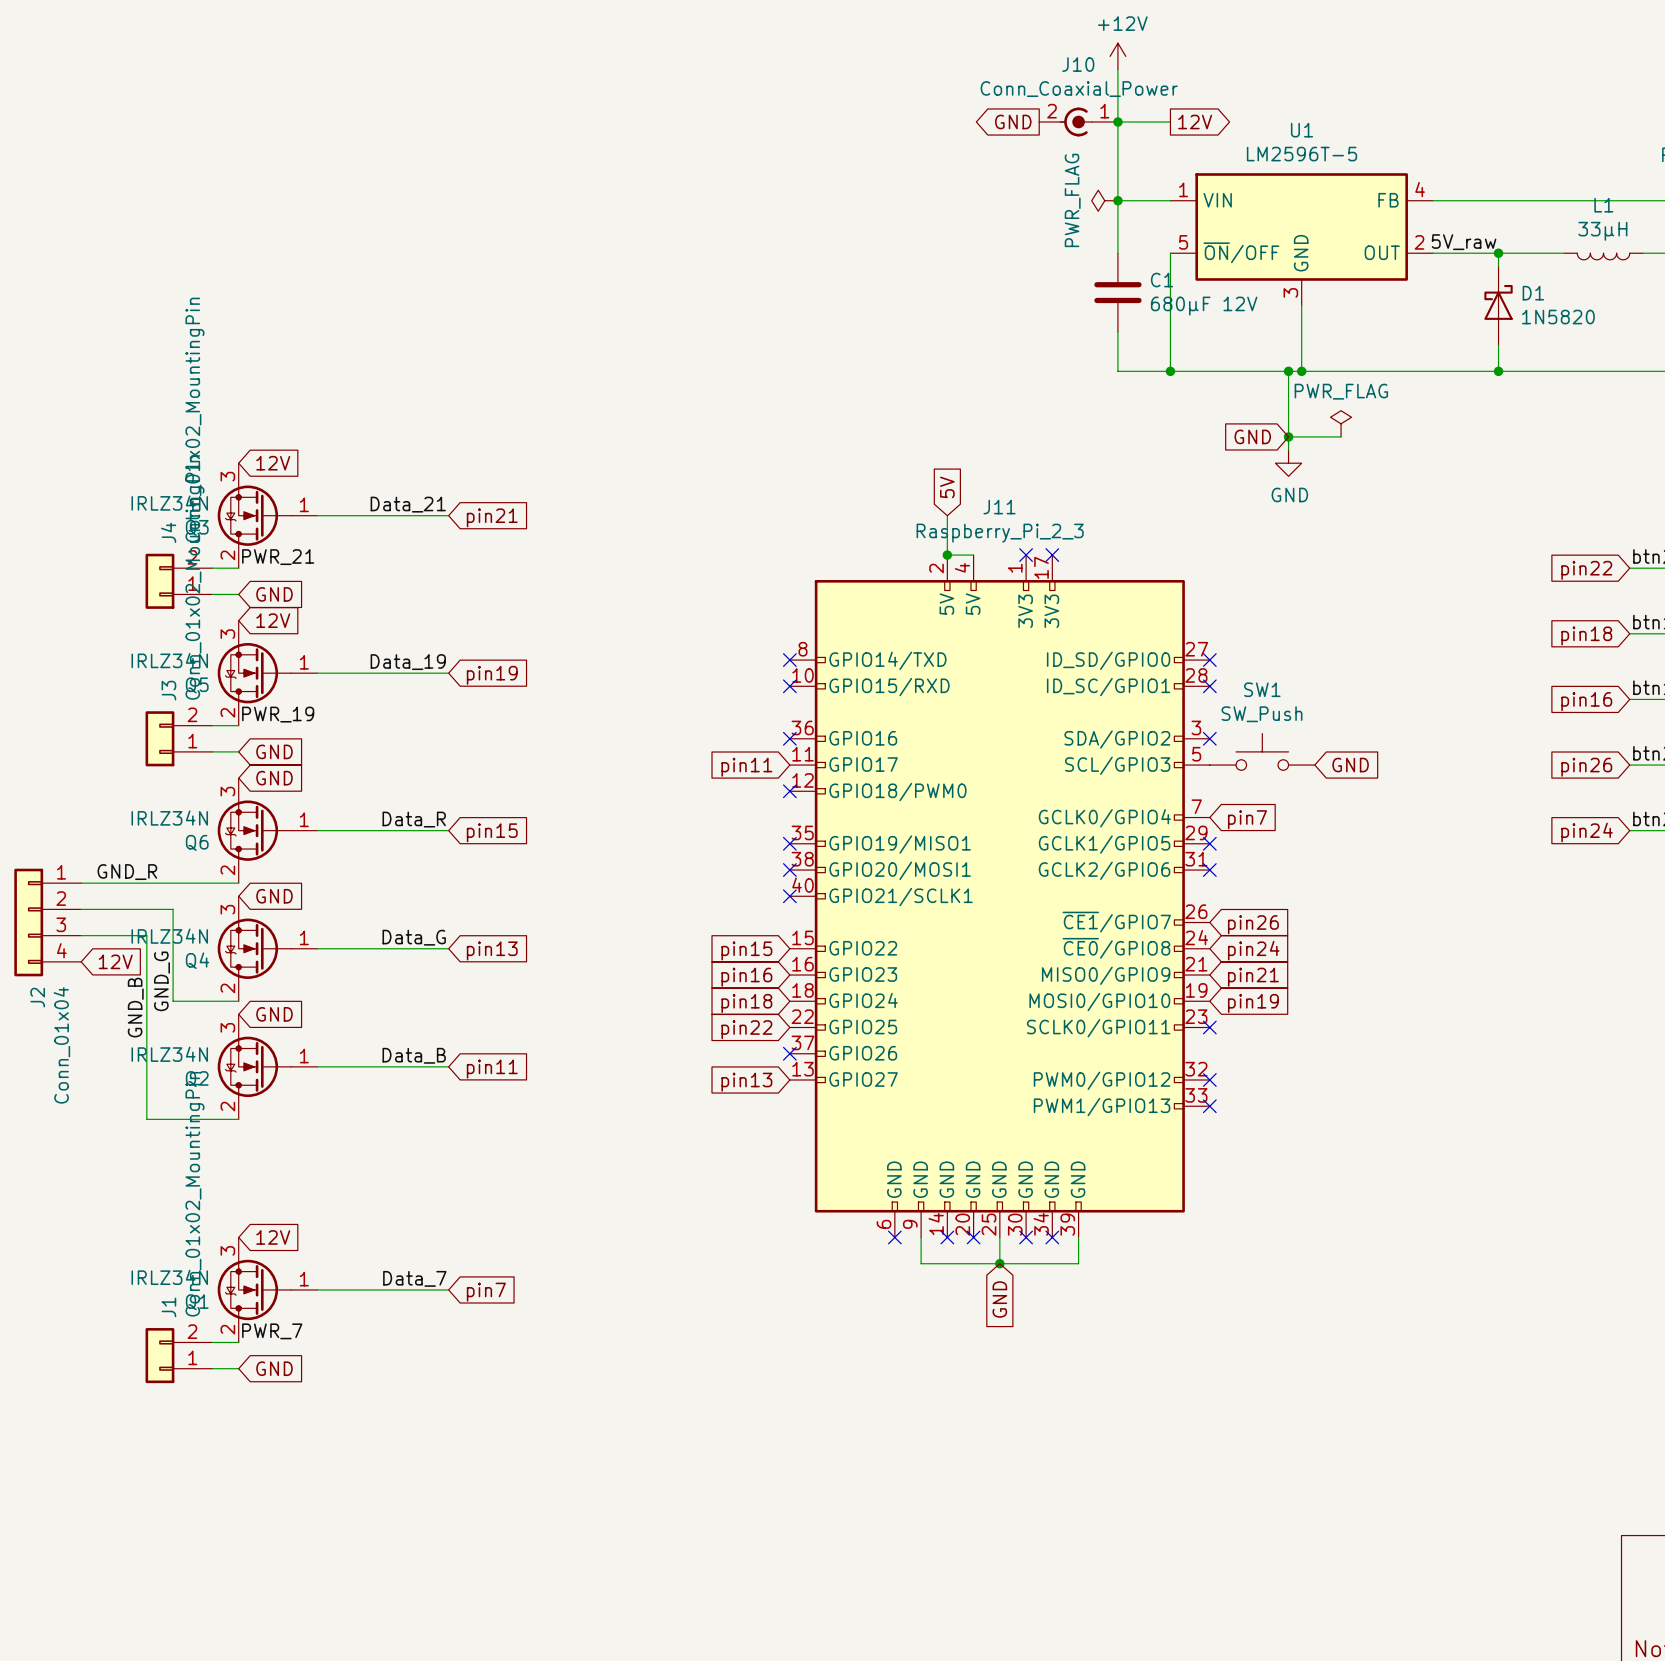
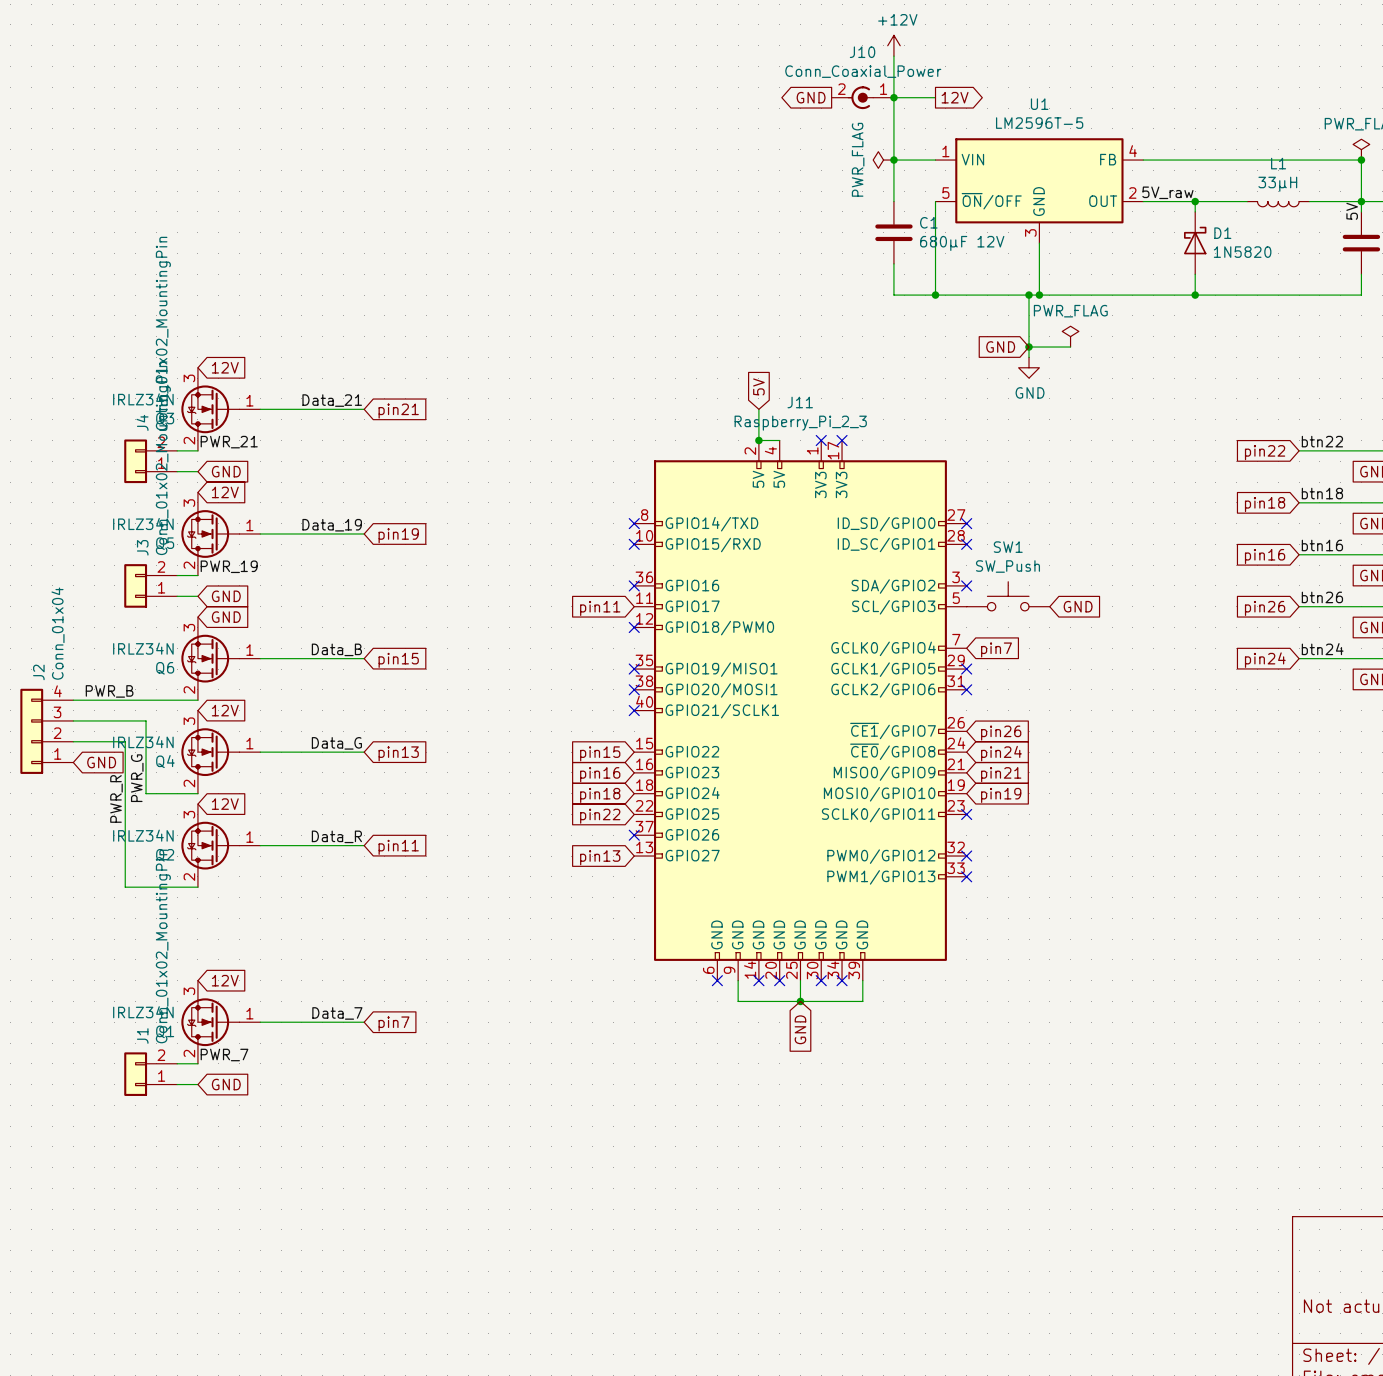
label: Data_R (414, 819) -> Data_B (336, 649)
label: GND_R (127, 872) -> PWR_B (109, 691)
global label: GND (274, 896) -> 12V (225, 710)
J2 flip: as is (28, 922) -> up-down (31, 731)
global label: 12V (115, 961) -> GND (101, 762)
label: GND_G (161, 981) -> PWR_G (137, 778)
label: GND_B (135, 1007) -> PWR_R (116, 798)
global label: GND (274, 1014) -> 12V (225, 804)
label: Data_B (414, 1055) -> Data_R (336, 836)

